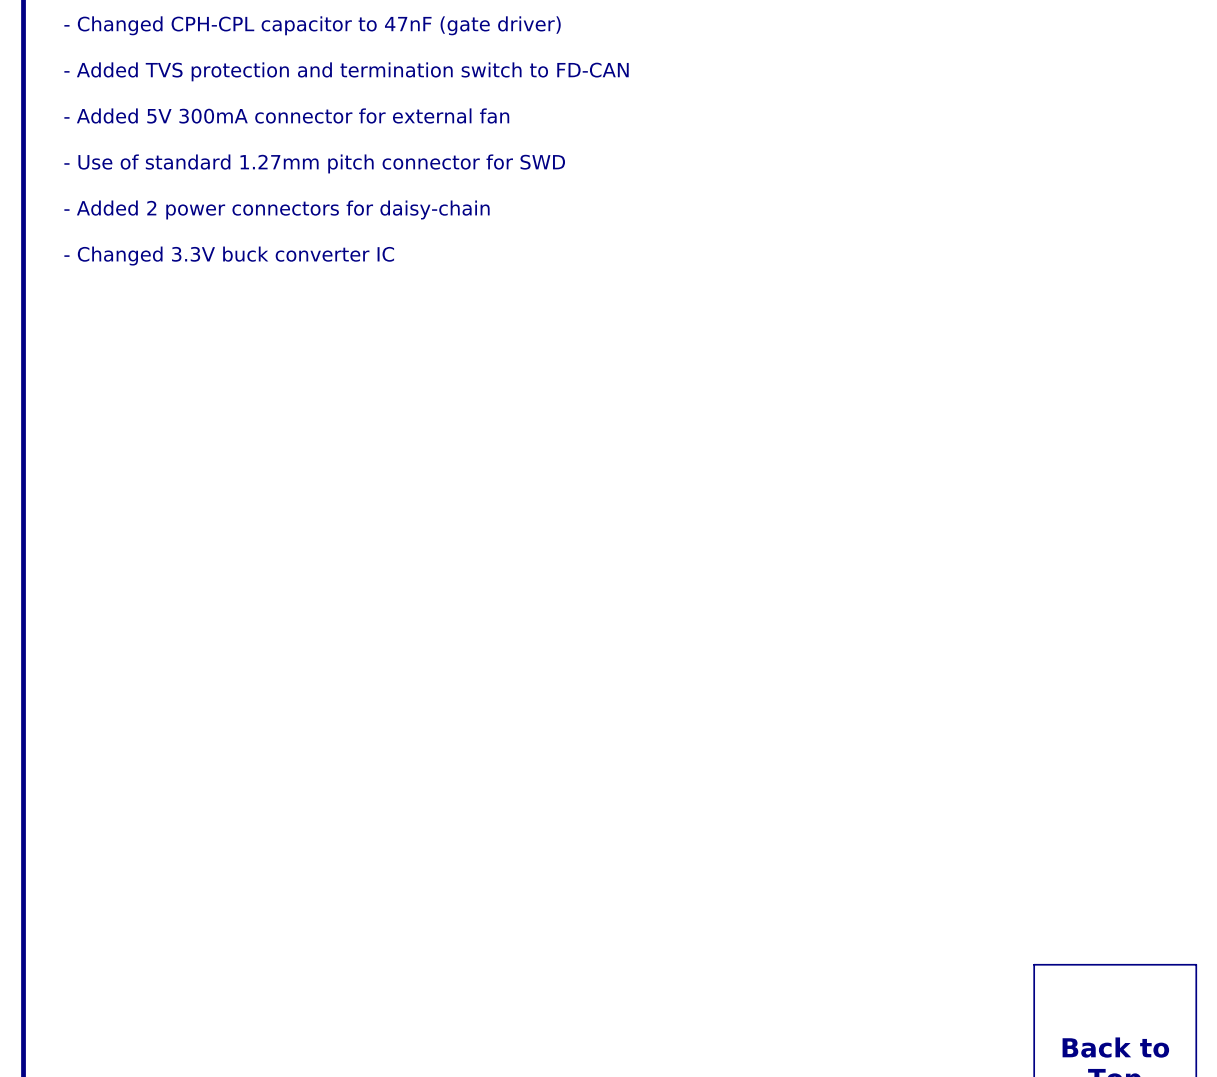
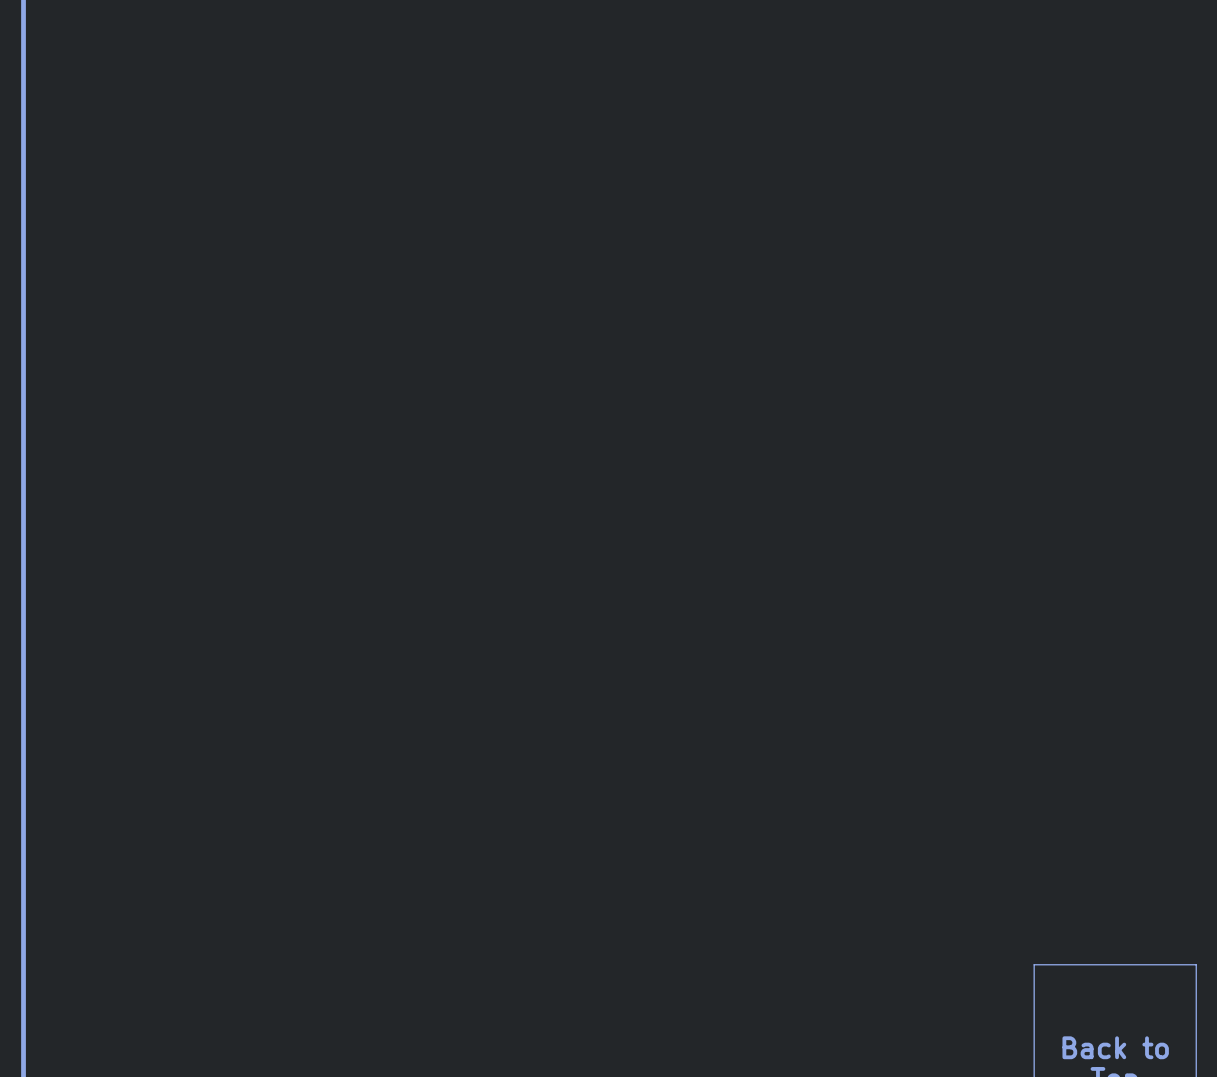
text: - Changed CPH-CPL capacitor to 47nF (gate driver) (312, 25) -> none
text: - Added TVS protection and termination switch to FD-CAN (346, 71) -> none
text: - Added 5V 300mA connector for external fan (286, 115) -> none
text: - Use of standard 1.27mm pitch connector for SWD (314, 163) -> none
text: - Added 2 power connectors for daisy-chain (276, 209) -> none
text: - Changed 3.3V buck converter IC (229, 256) -> none

